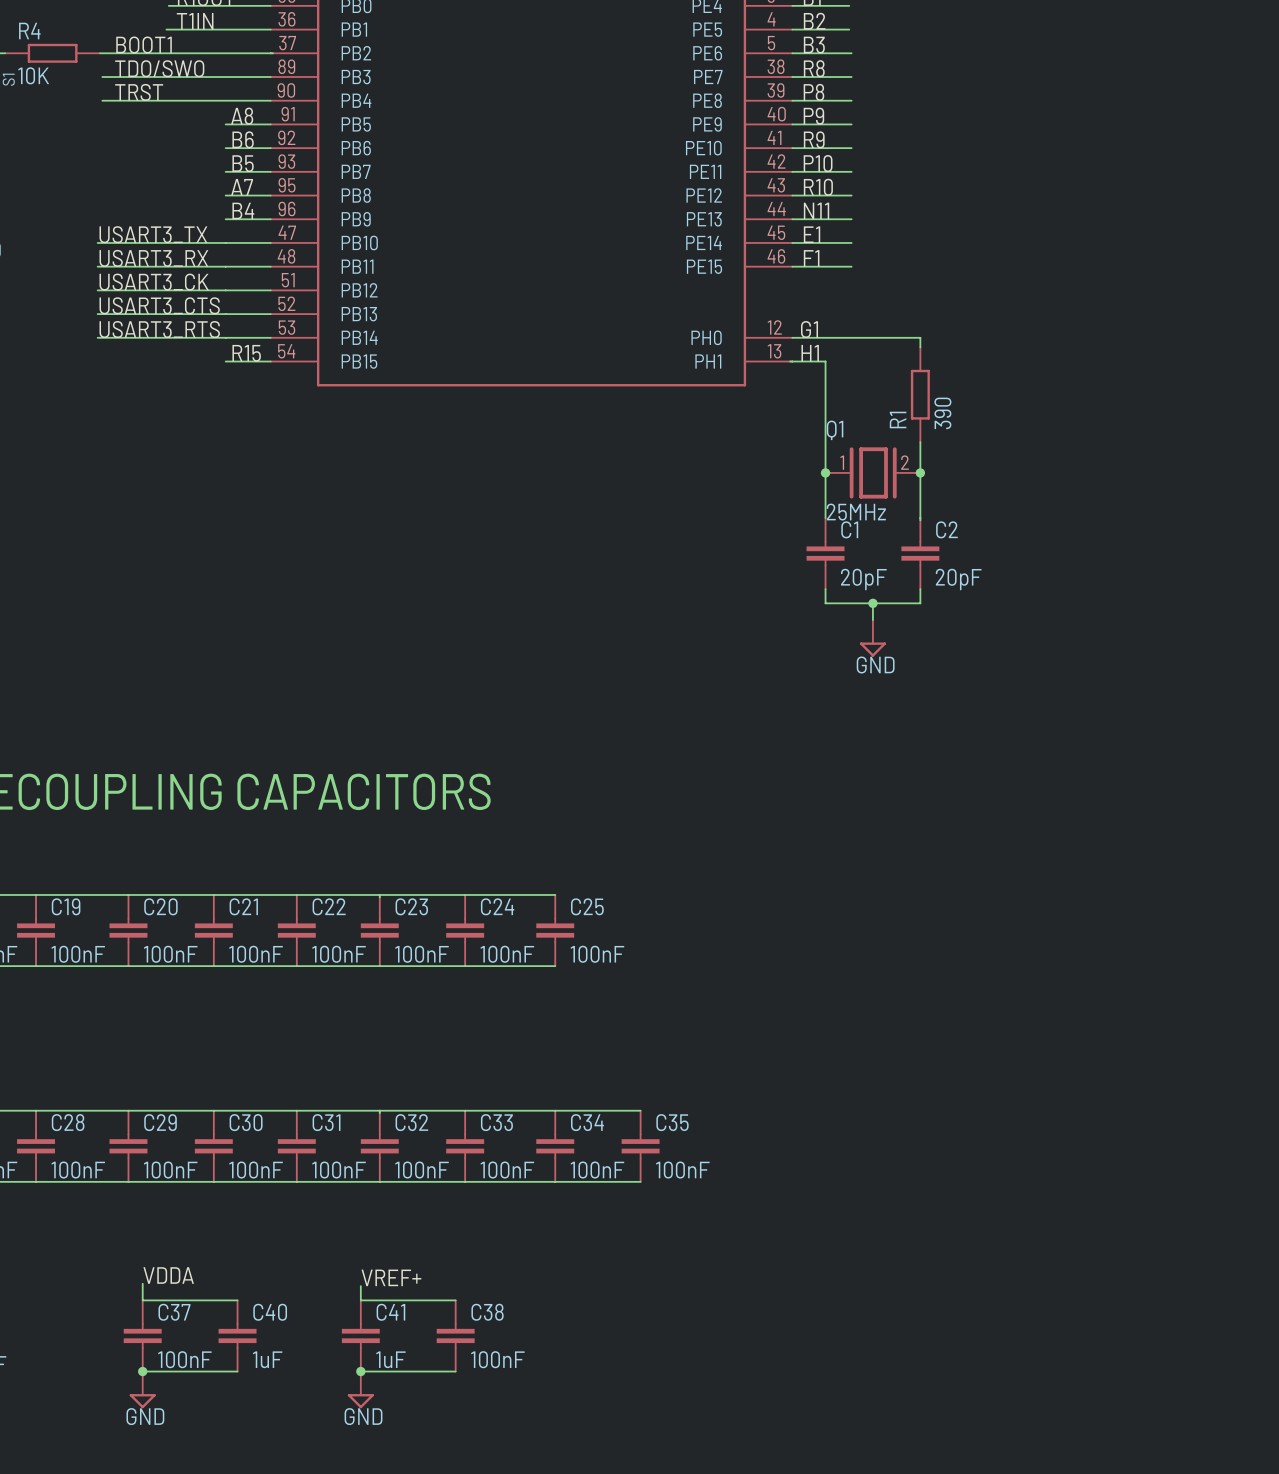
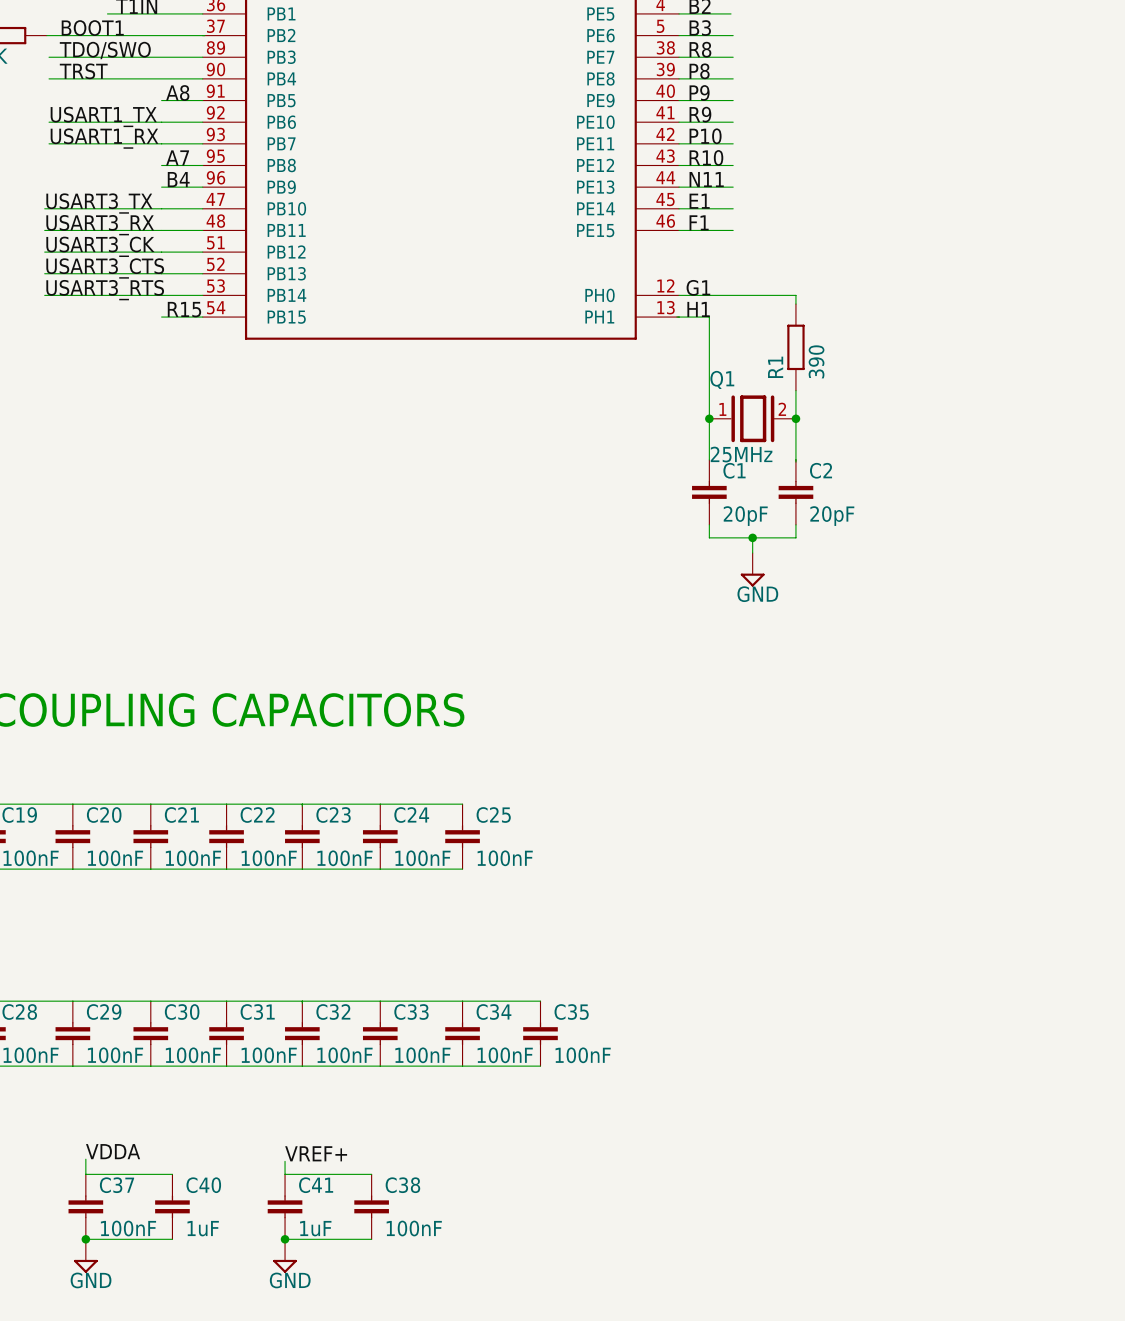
label: none -> USART1_TX (103, 116)
label: B6 (243, 139) -> none
wire: none -> (49, 122) (161, 122)
label: none -> USART1_RX (104, 138)
label: B5 (243, 163) -> none
wire: none -> (49, 143) (161, 143)

